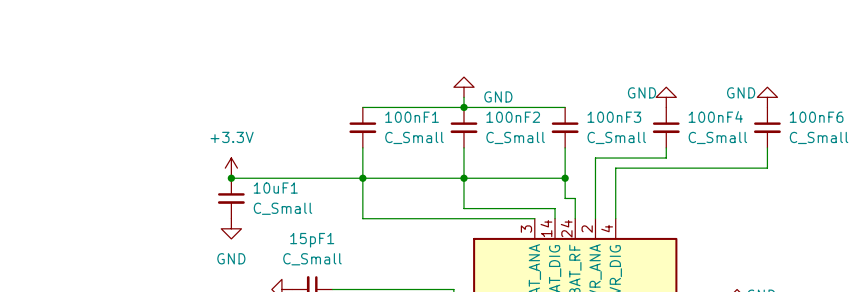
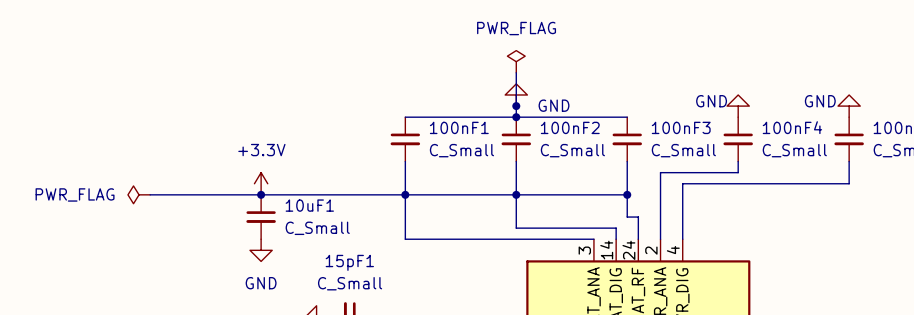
power symbol: none -> PWR_FLAG (516, 61)
wire: none -> (516, 72) (516, 106)
junction: none -> (516, 106)
power symbol: none -> PWR_FLAG (139, 194)
wire: none -> (150, 194) (261, 194)

